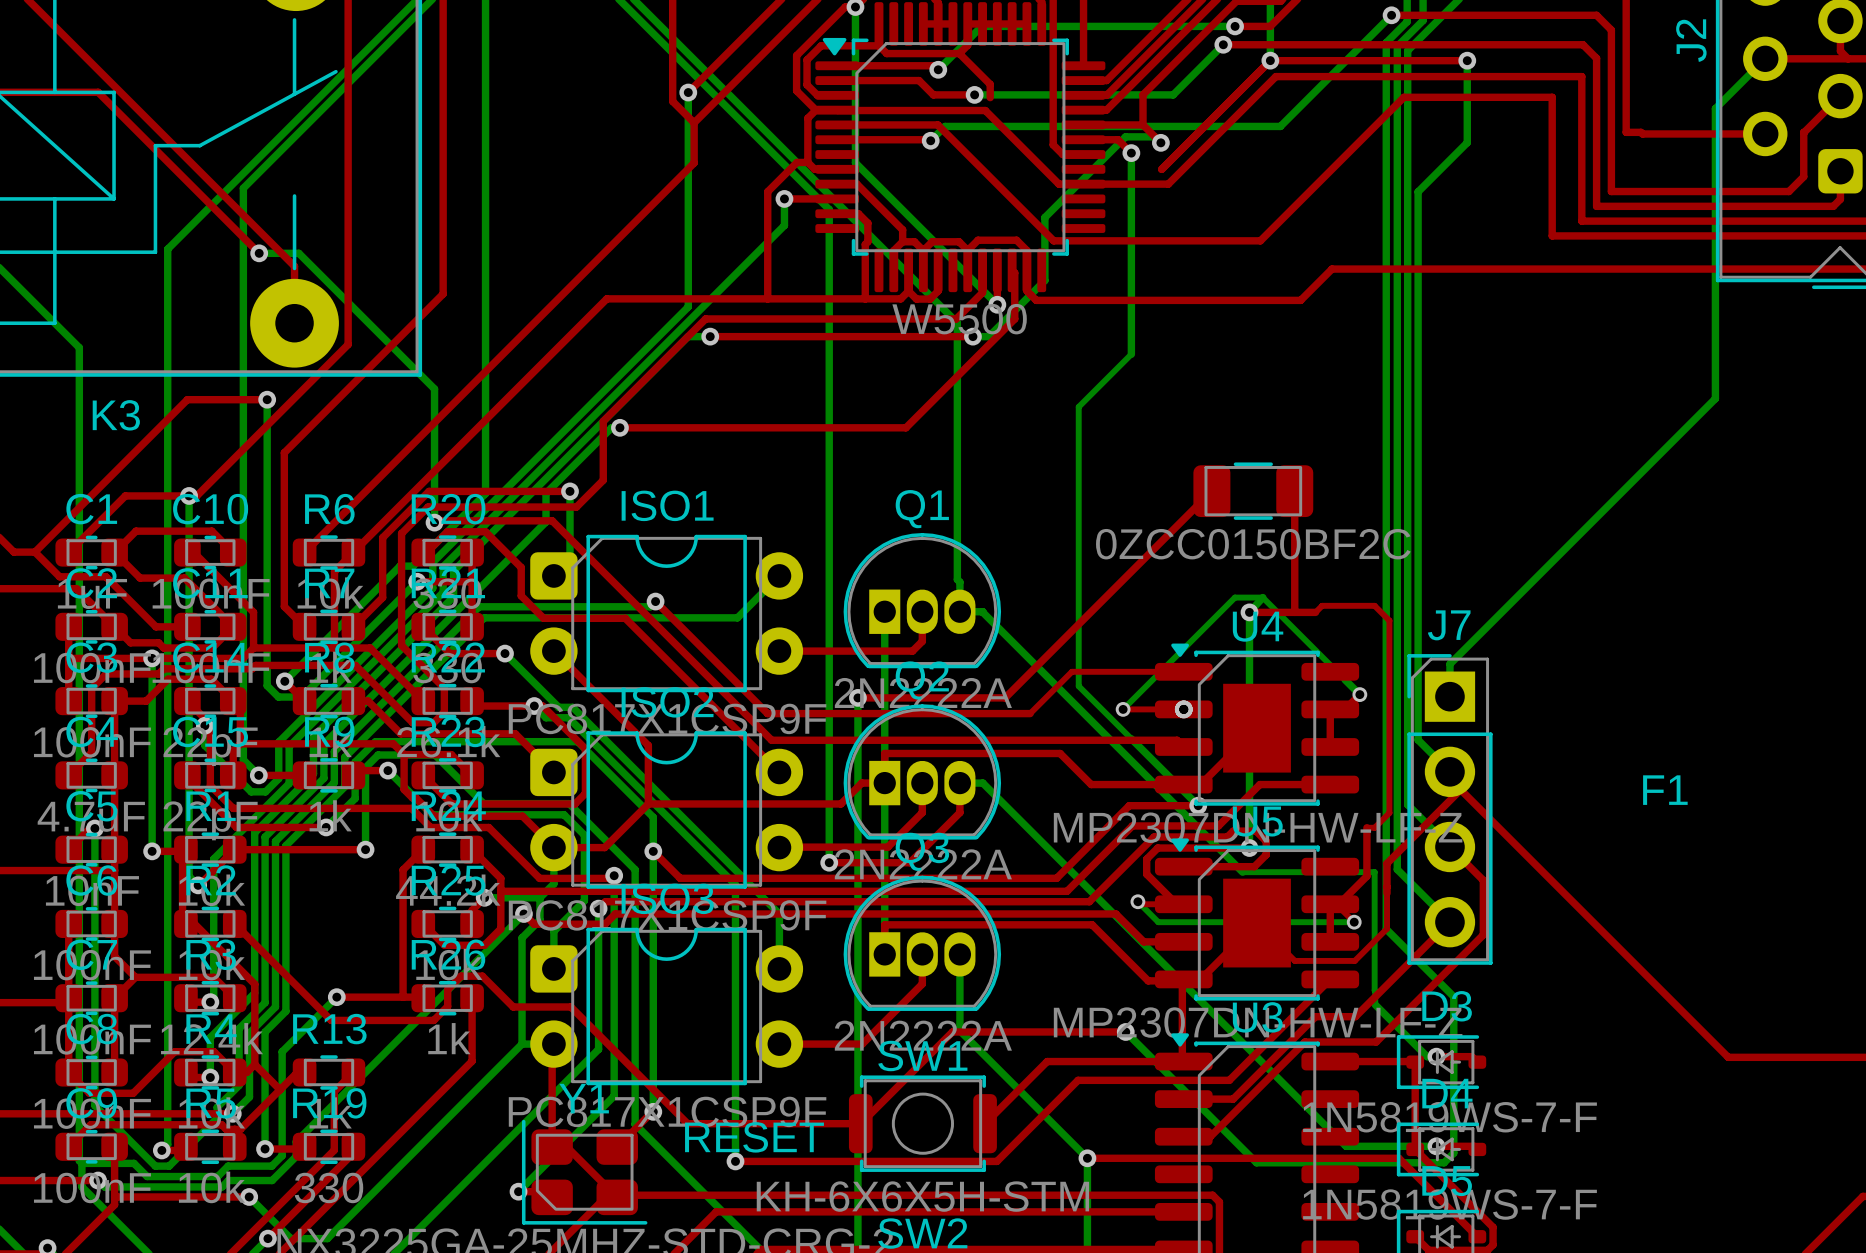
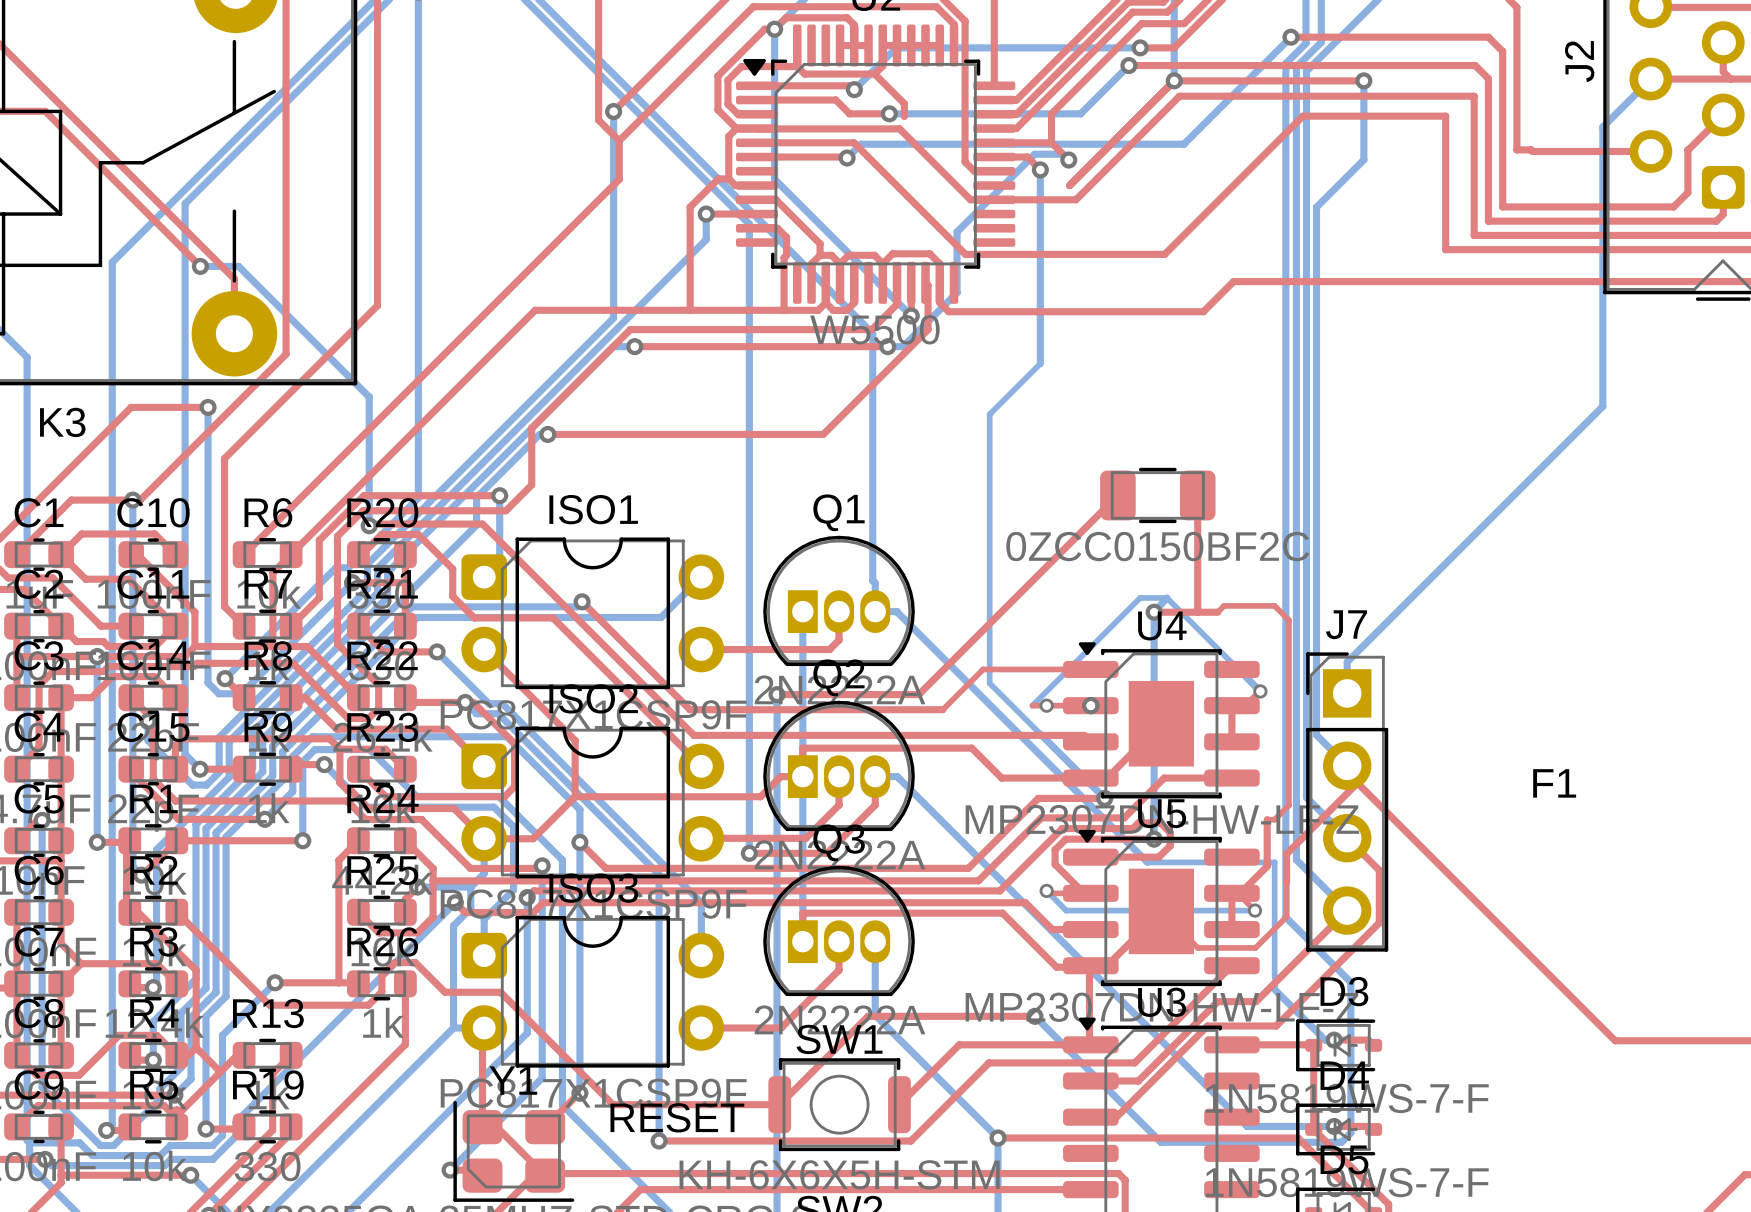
via position: (1123, 709) -> (1046, 705)

